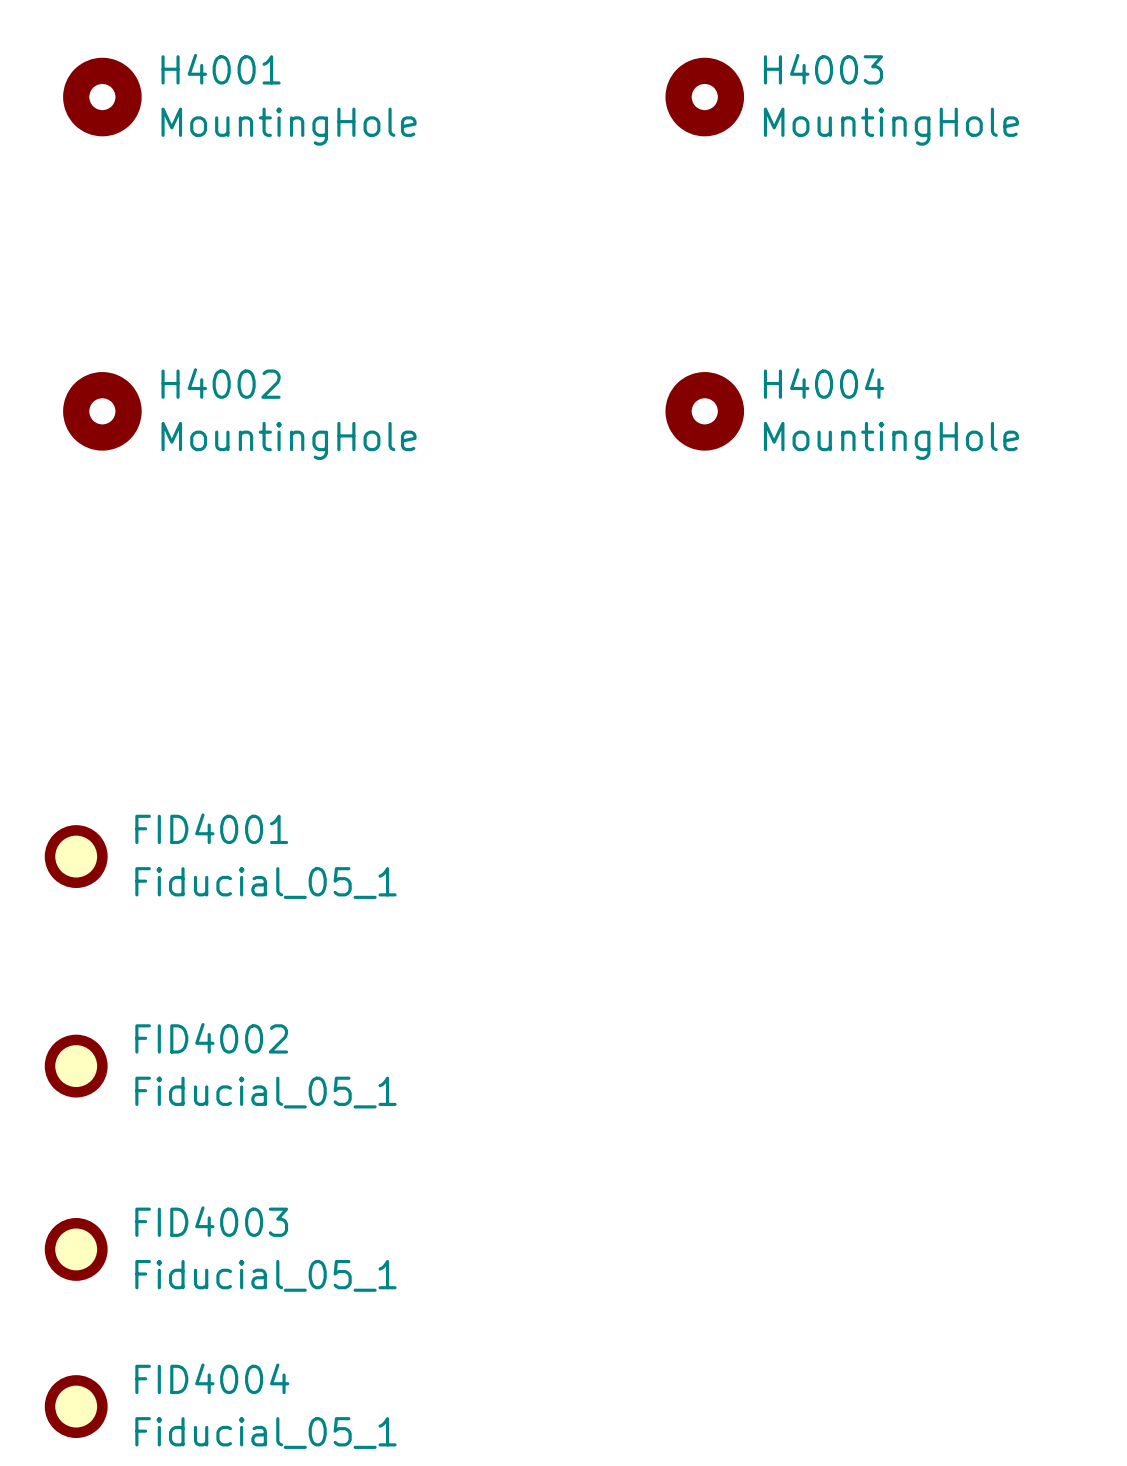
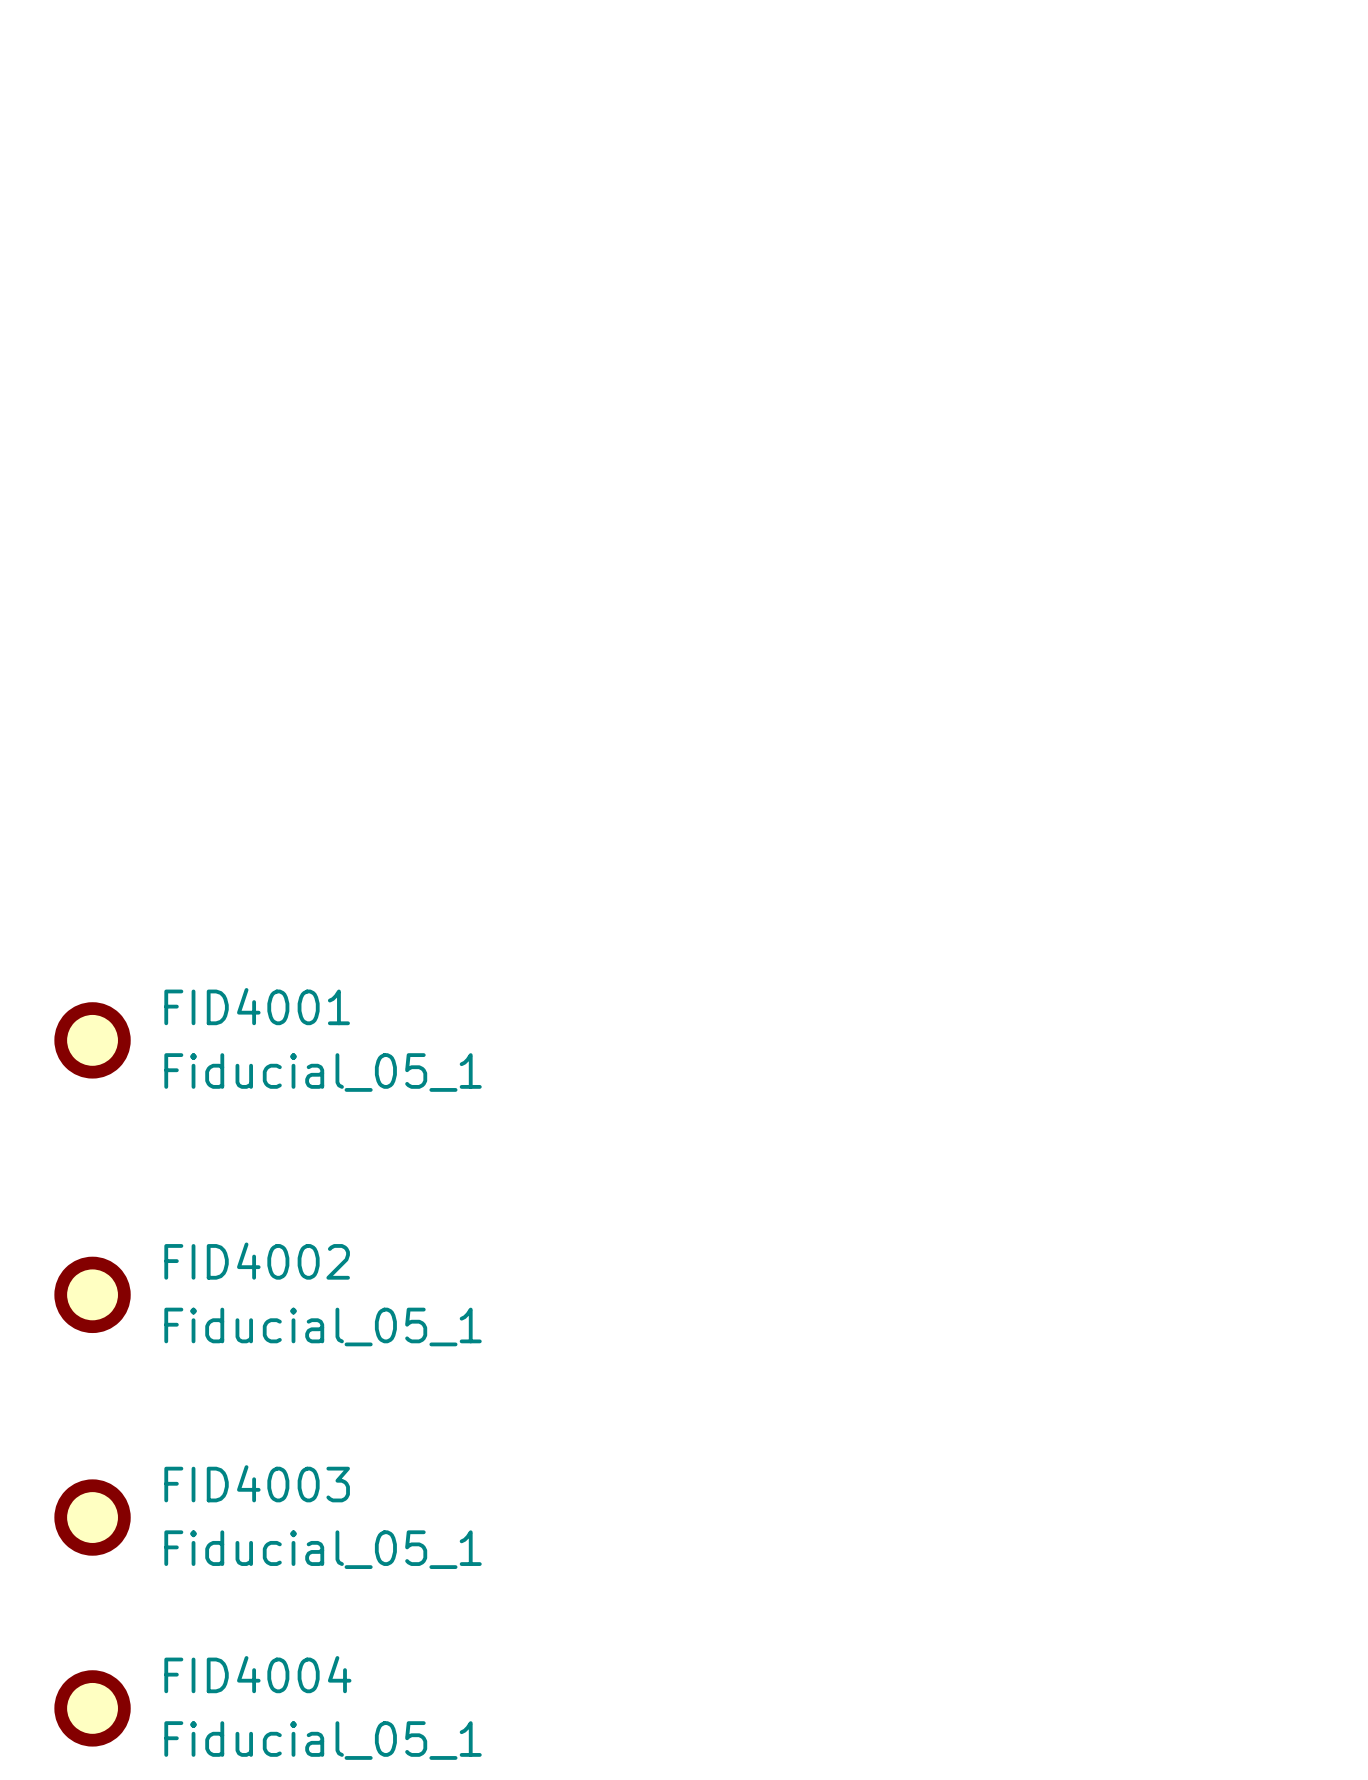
H4001: MountingHole (102, 97) -> none
H4003: MountingHole (704, 97) -> none
H4002: MountingHole (102, 411) -> none
H4004: MountingHole (704, 411) -> none

